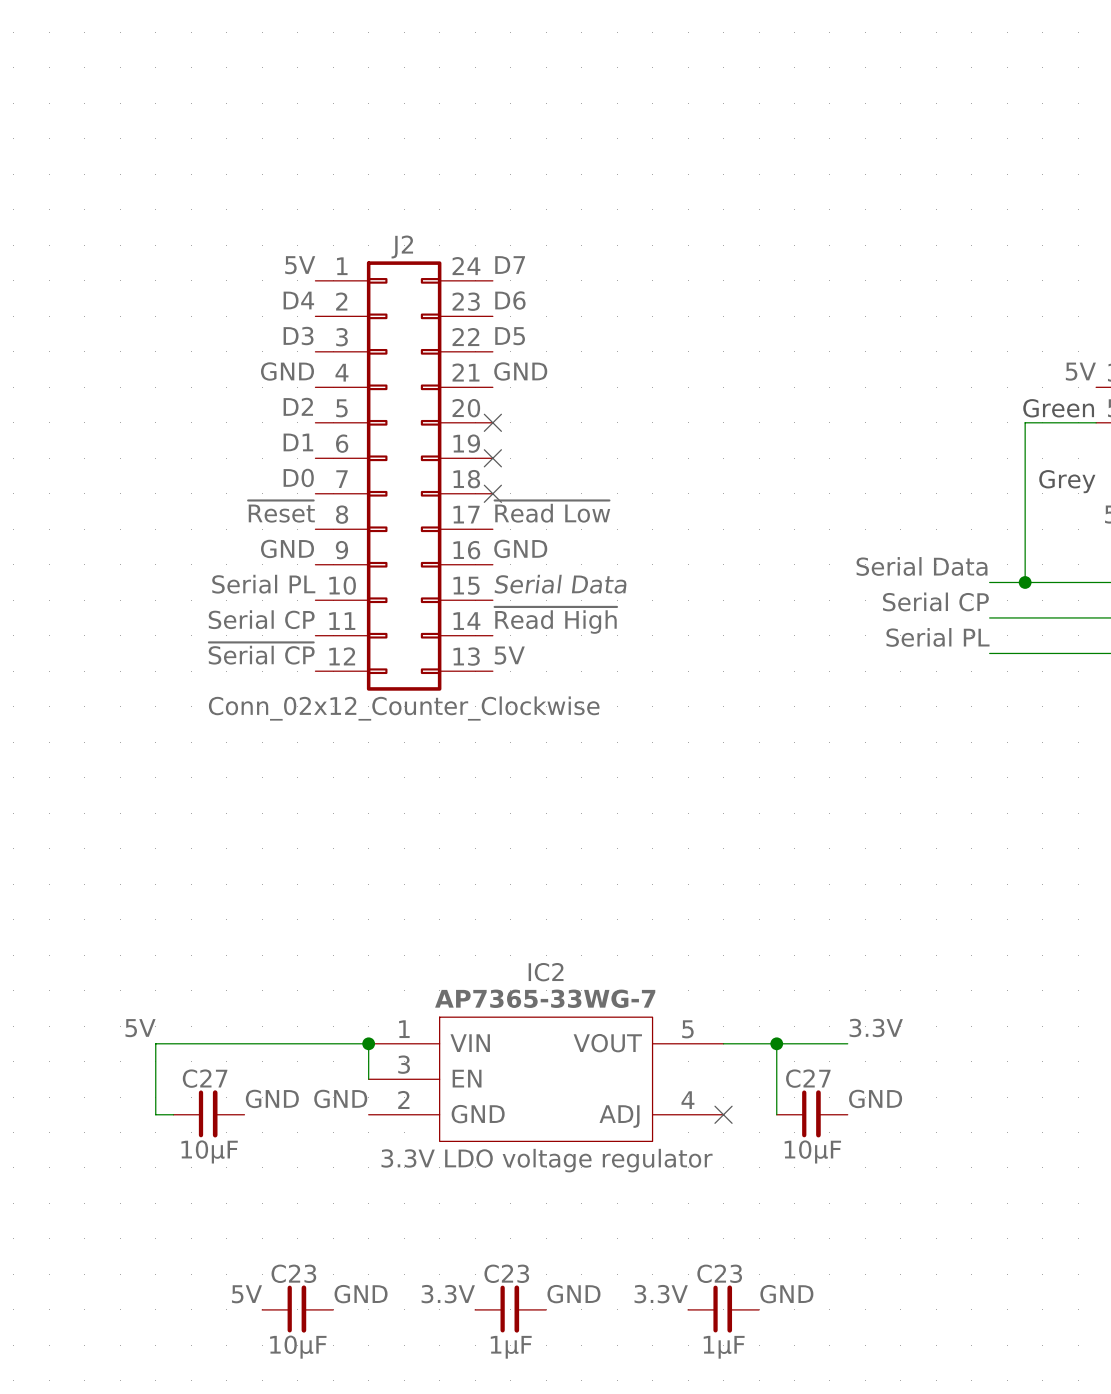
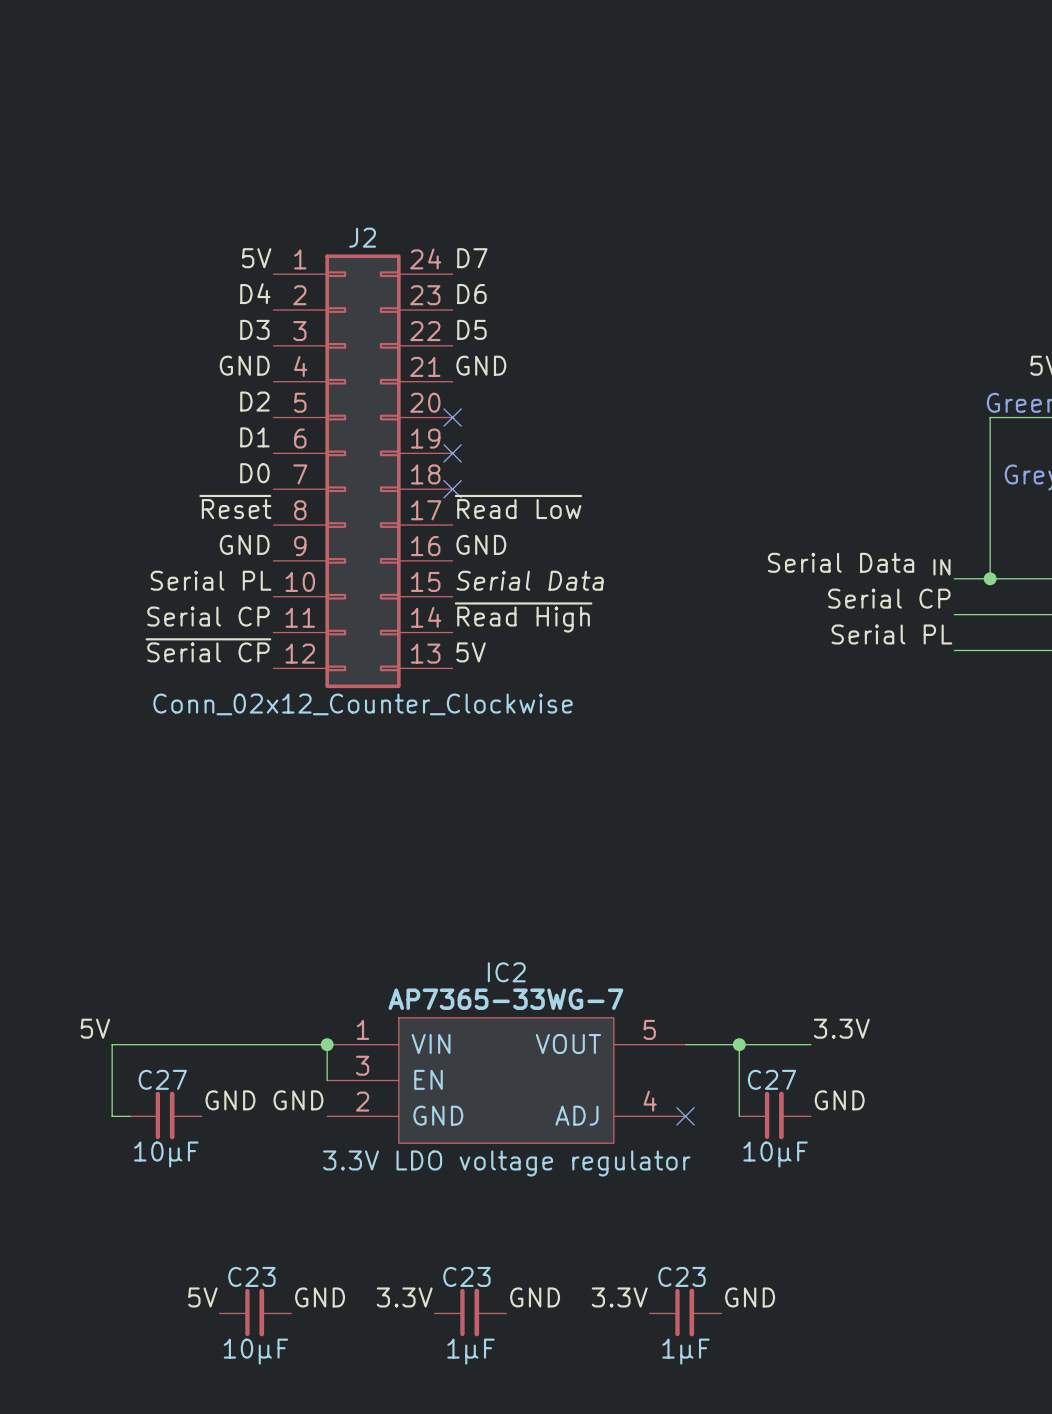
label: Serial Data (922, 566) -> Serial Data IN (859, 564)

